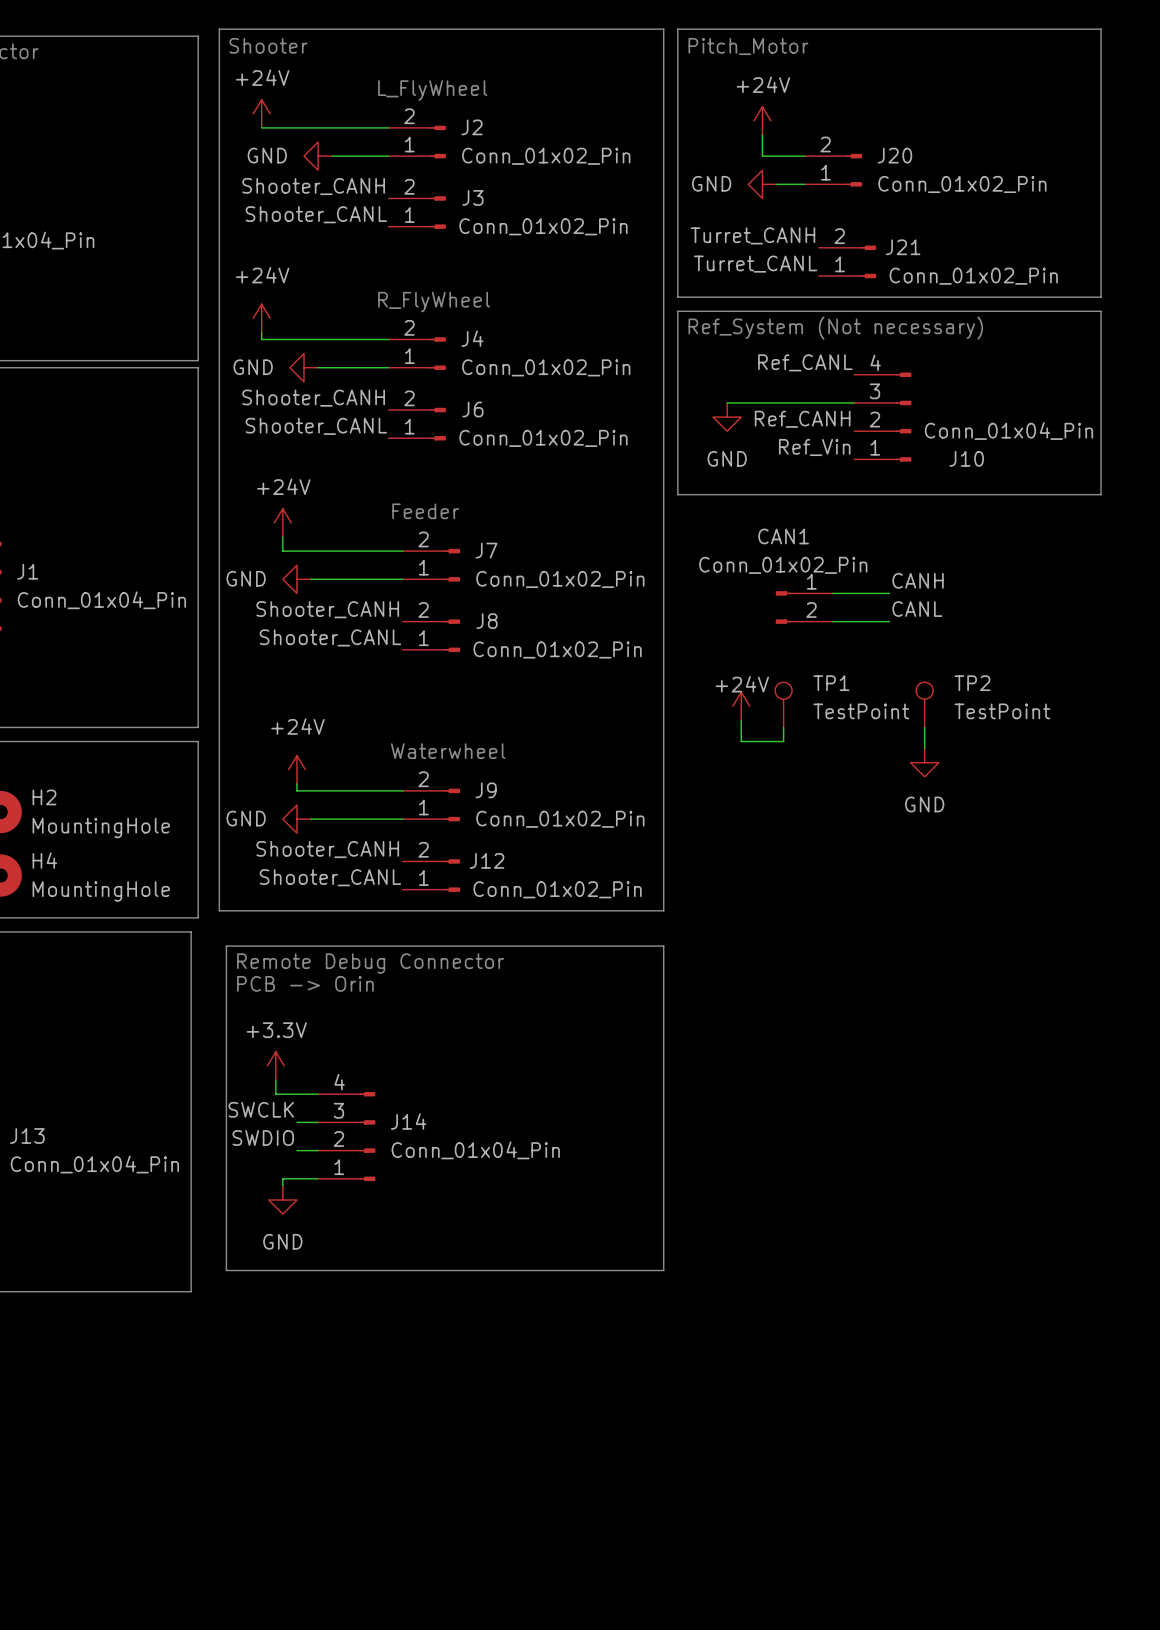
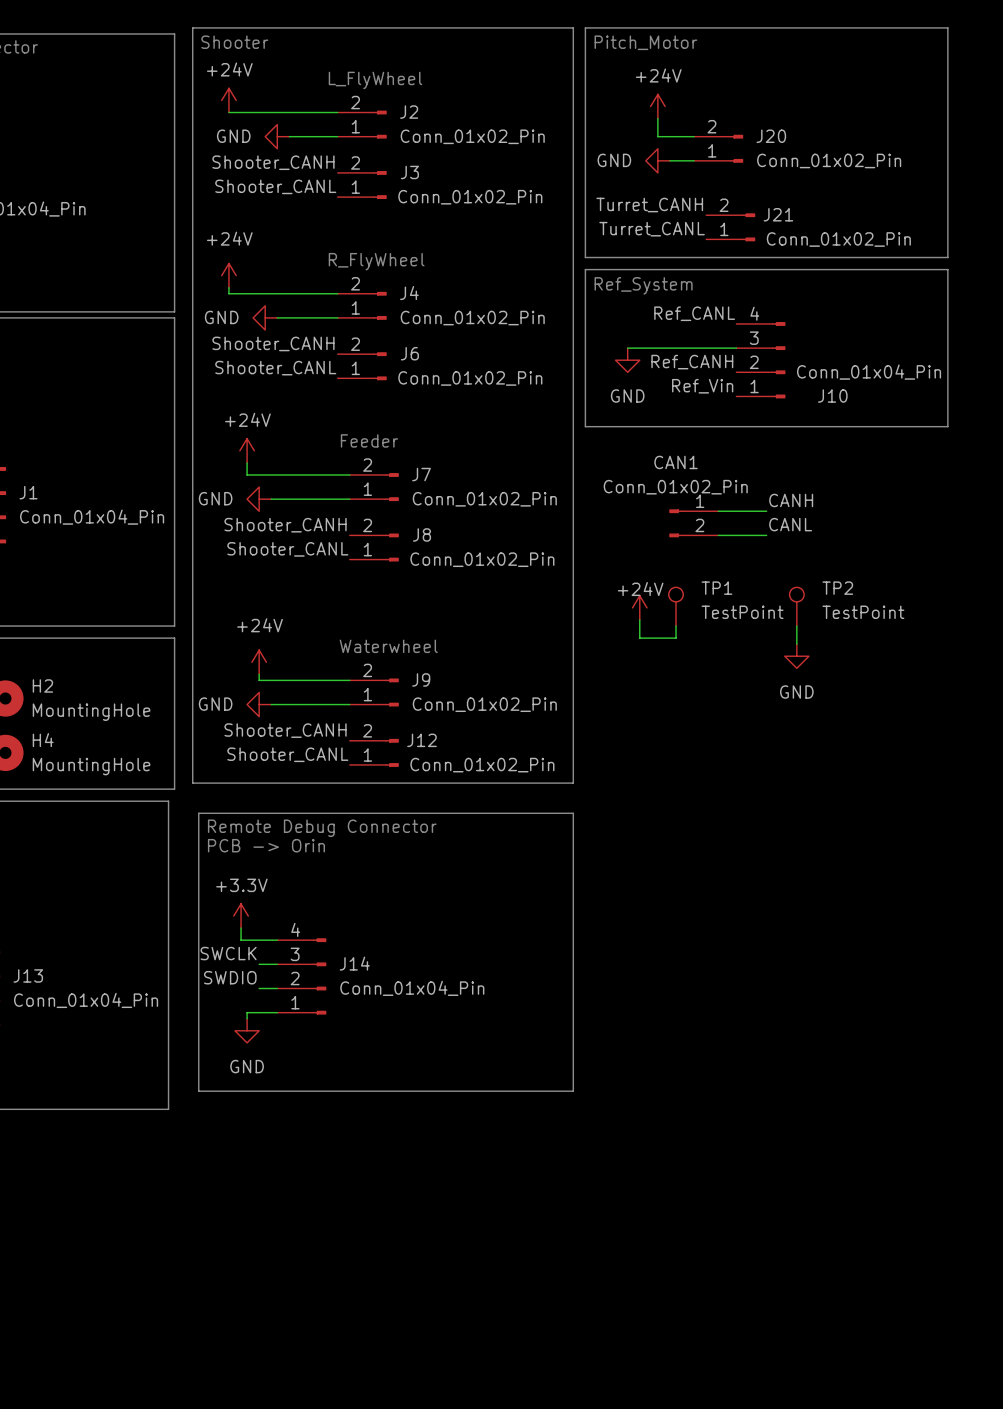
text: Ref_System (Not necessary) (835, 328) -> Ref_System (643, 285)

